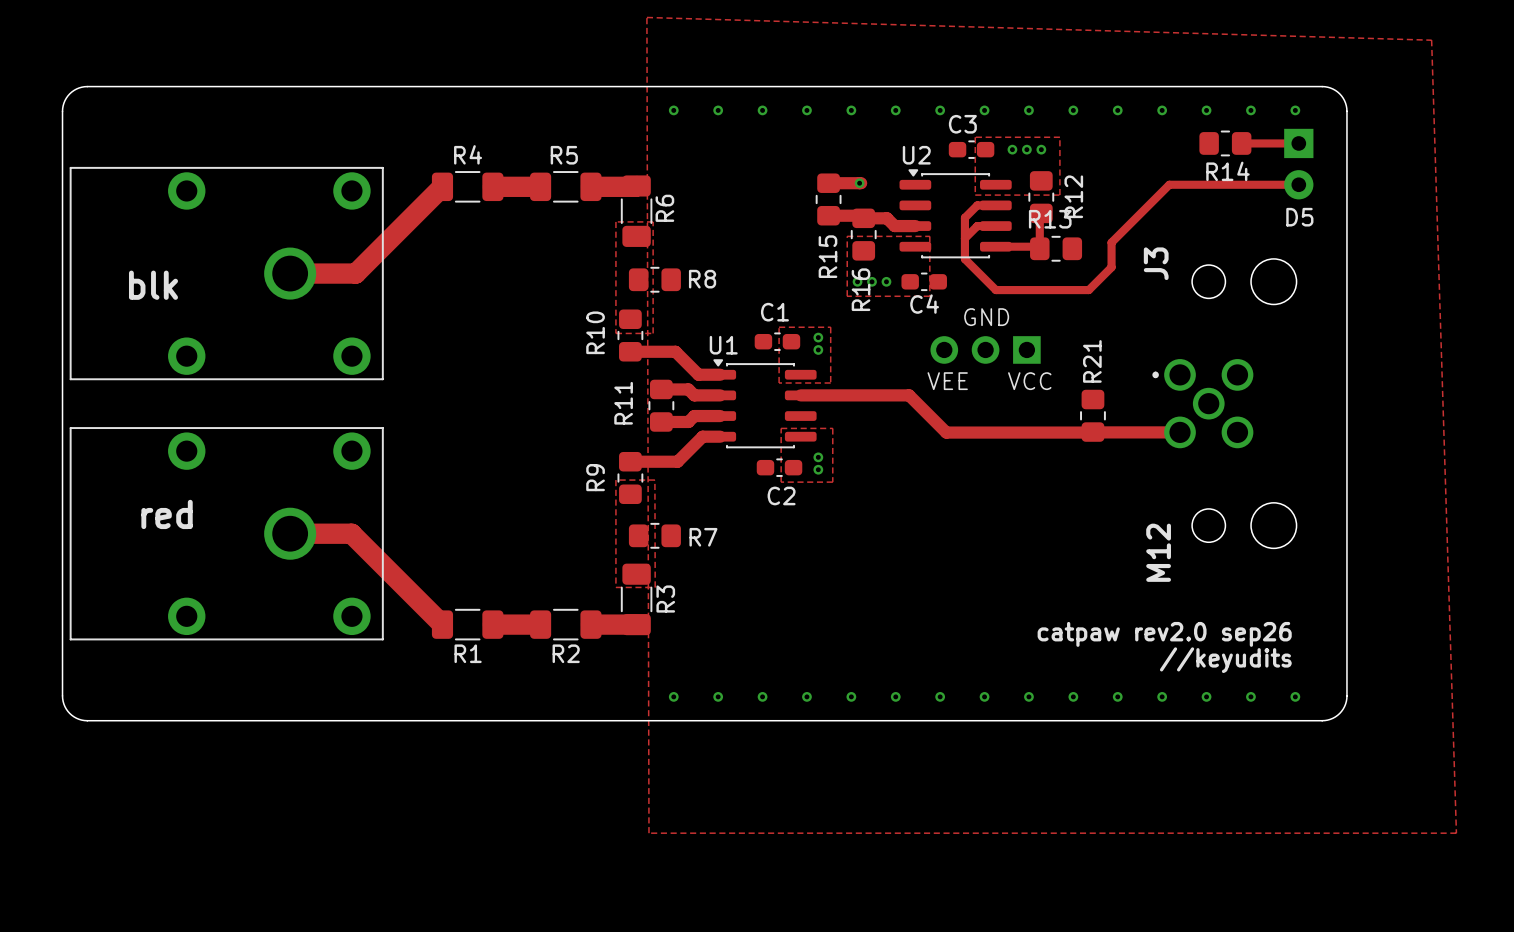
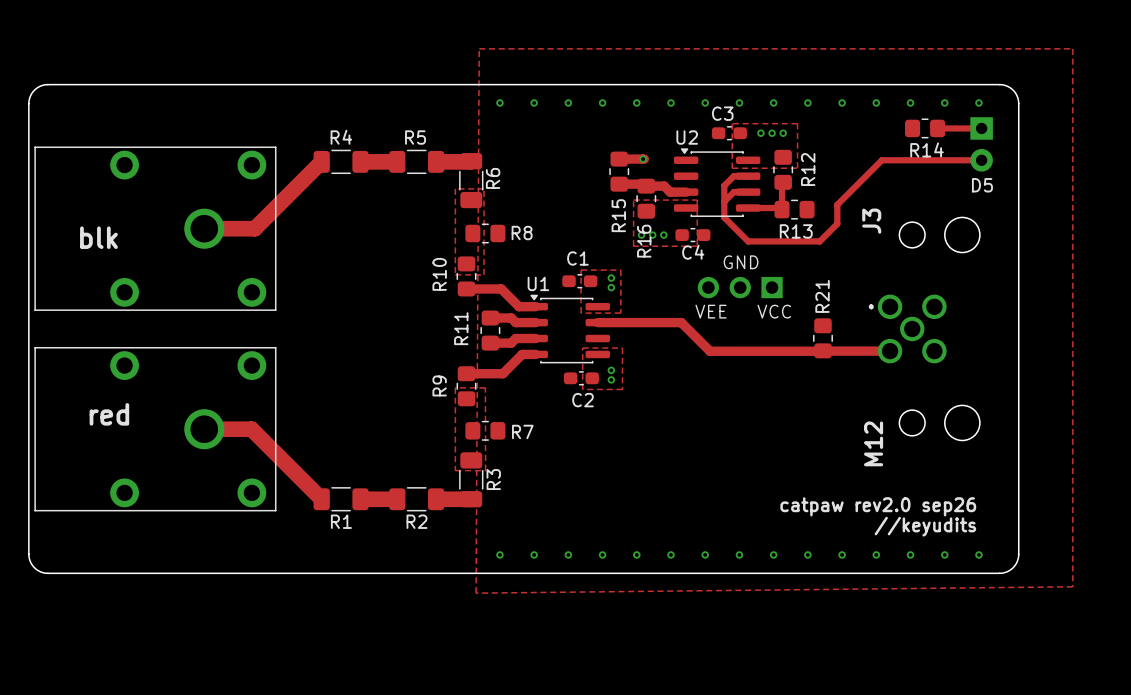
zone outline: (646, 17) (1431, 40) (1456, 833) (648, 833) (646, 17) -> (479, 48) (476, 593) (1072, 586) (1072, 48) (479, 48)
R13 name position: R13 (1050, 219) -> R13 (796, 231)

